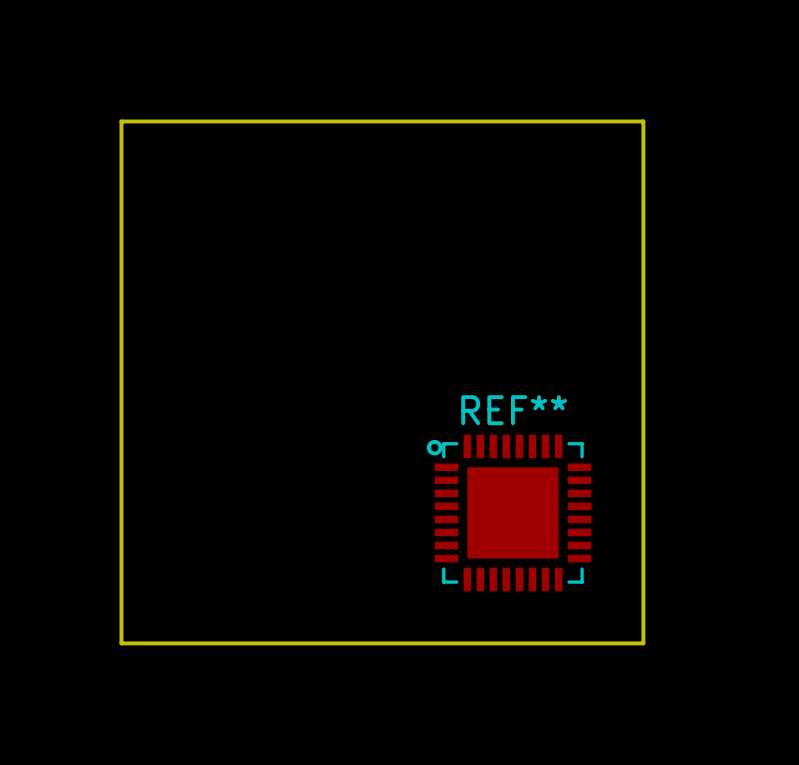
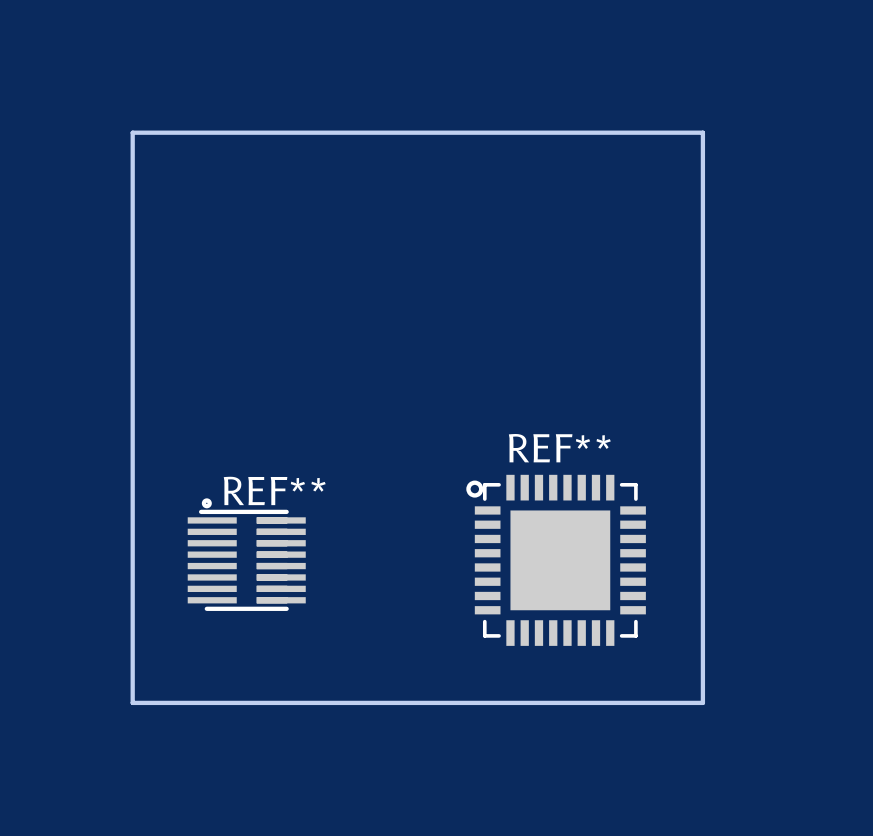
REF**: none -> (246, 554)

